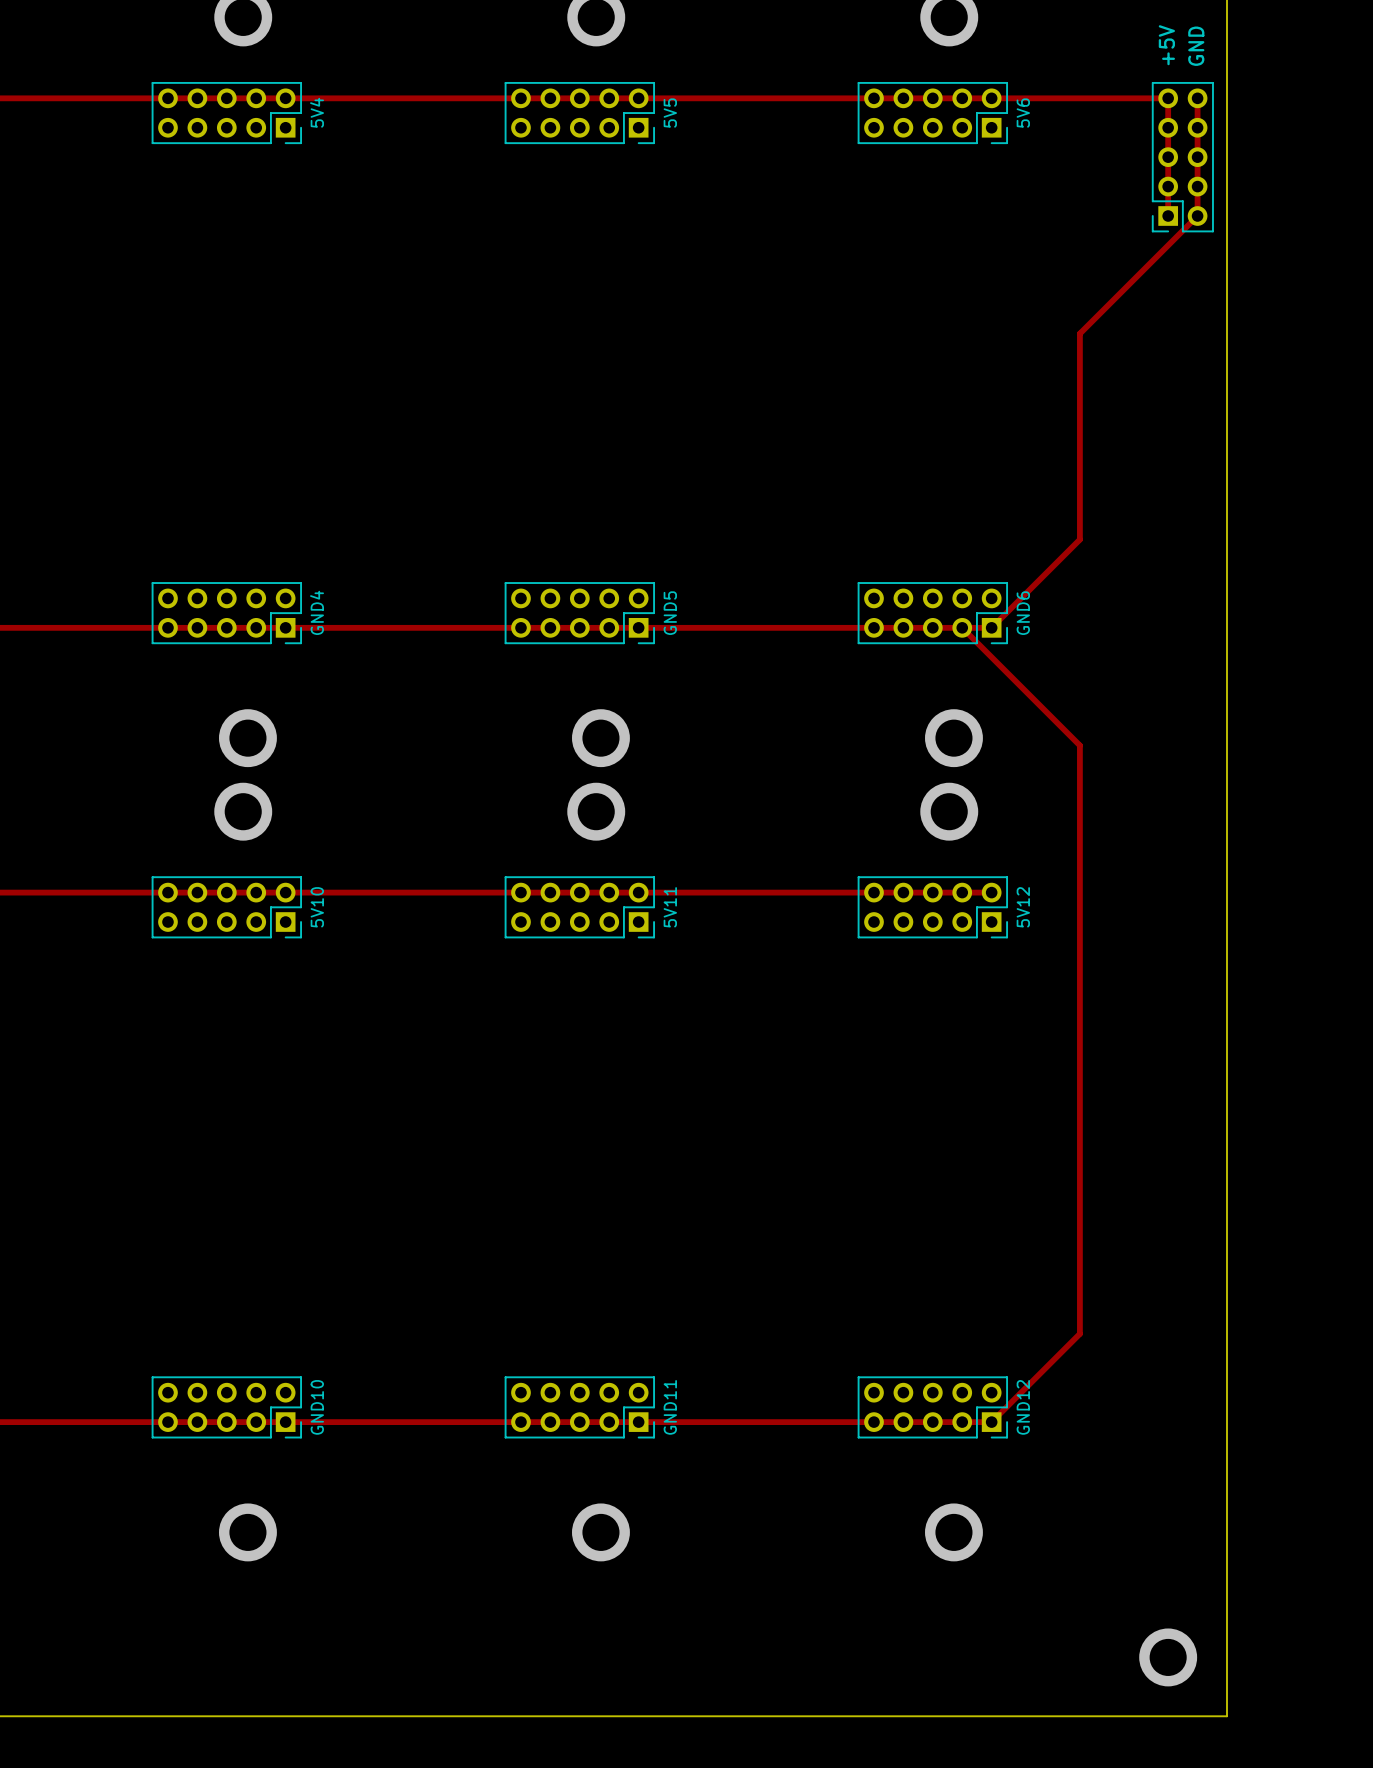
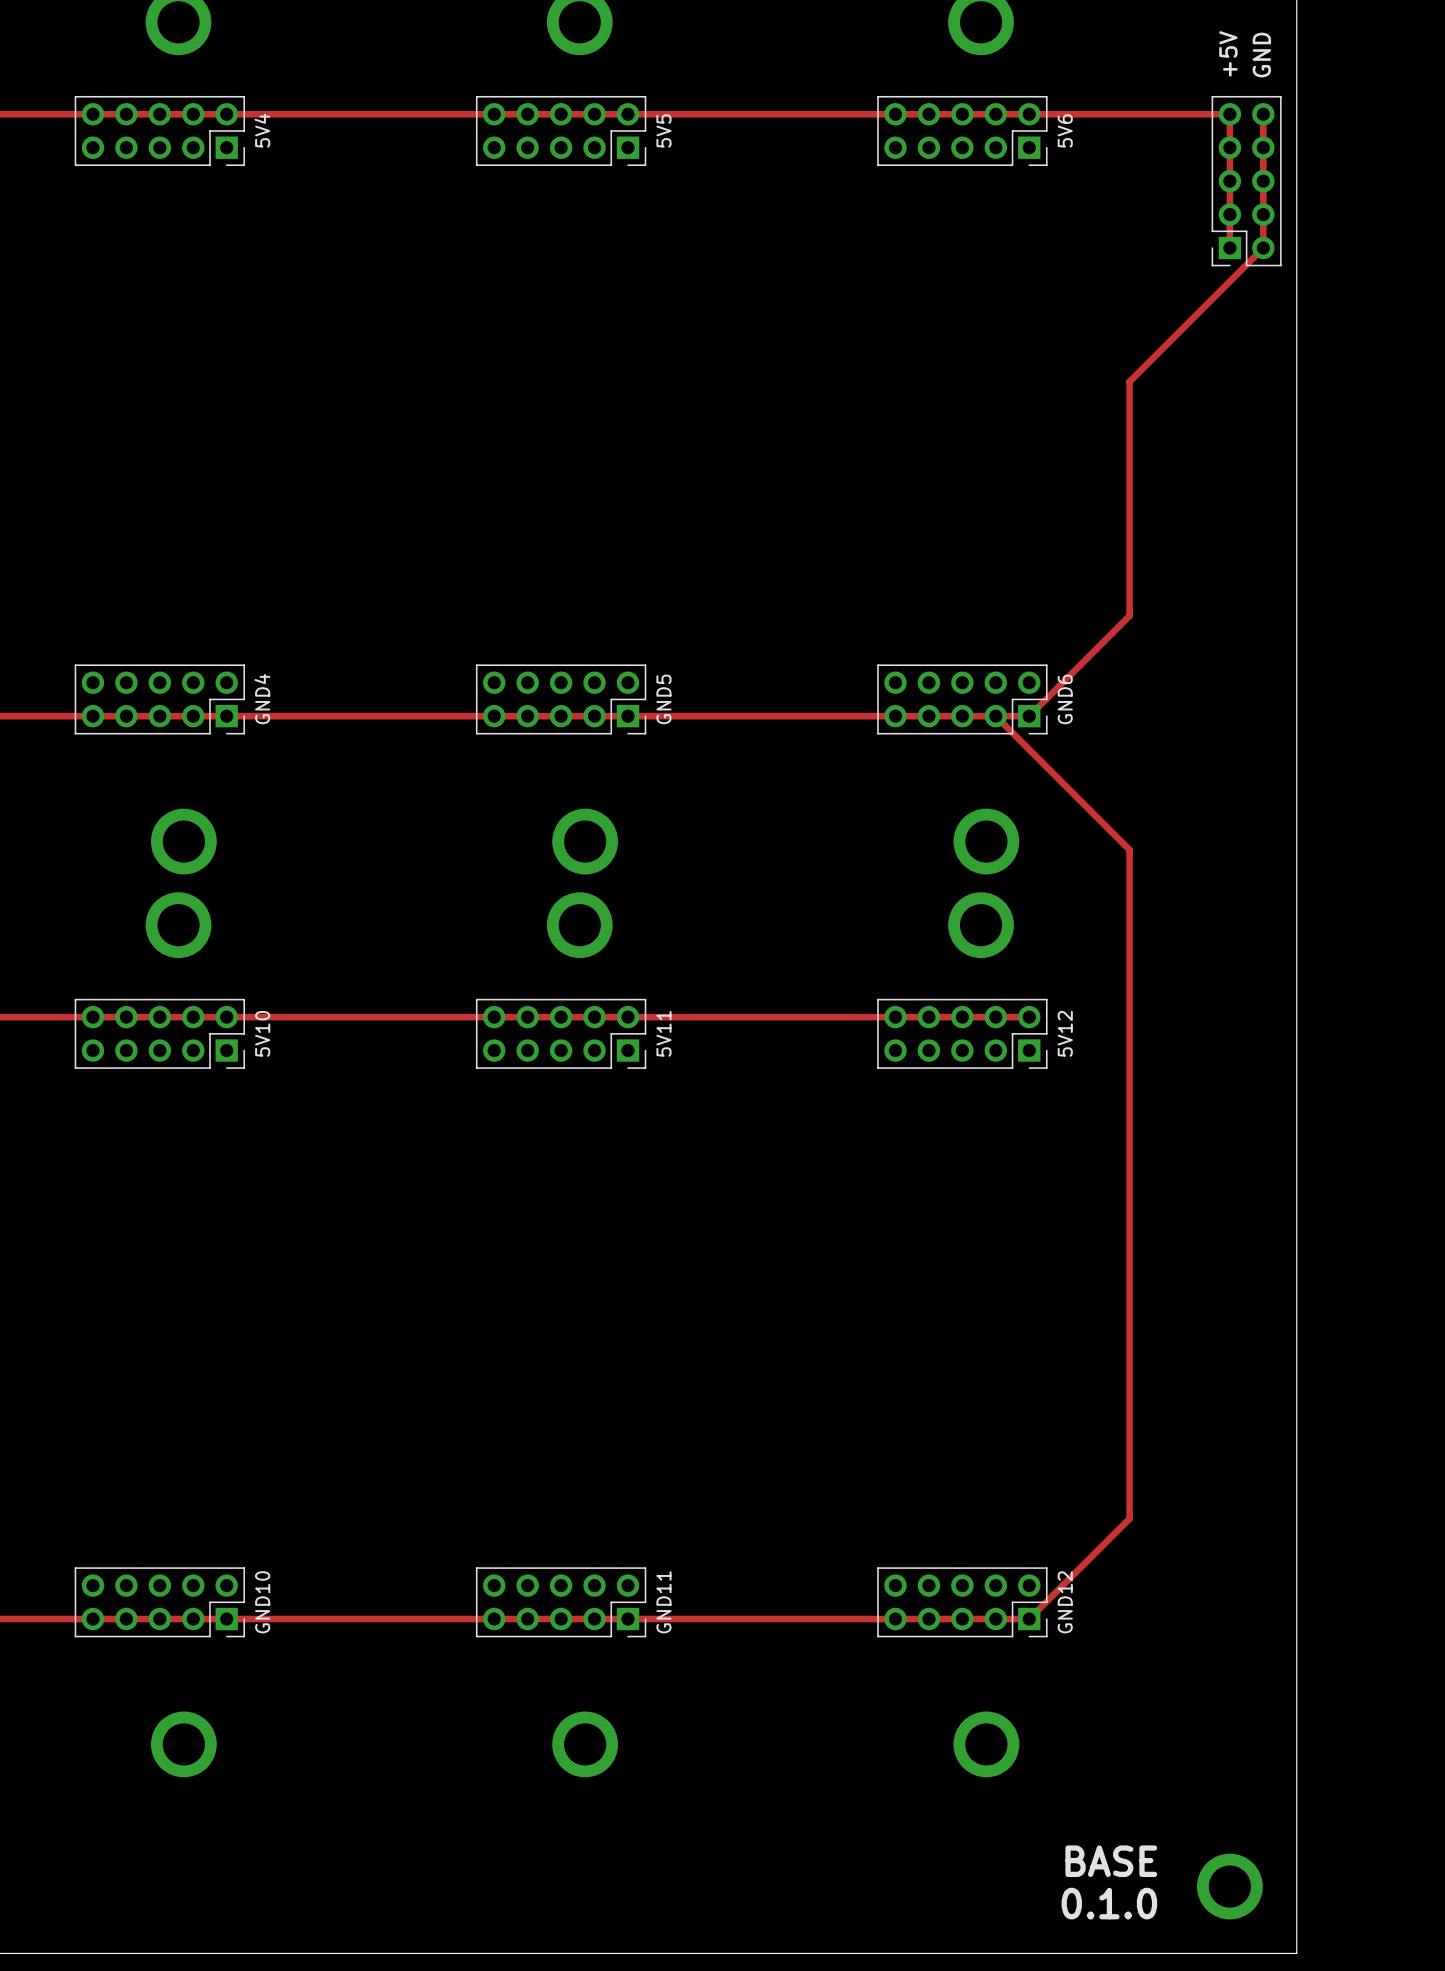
text: none -> BASE (1111, 1861)
text: none -> 0.1.0 (1109, 1903)

